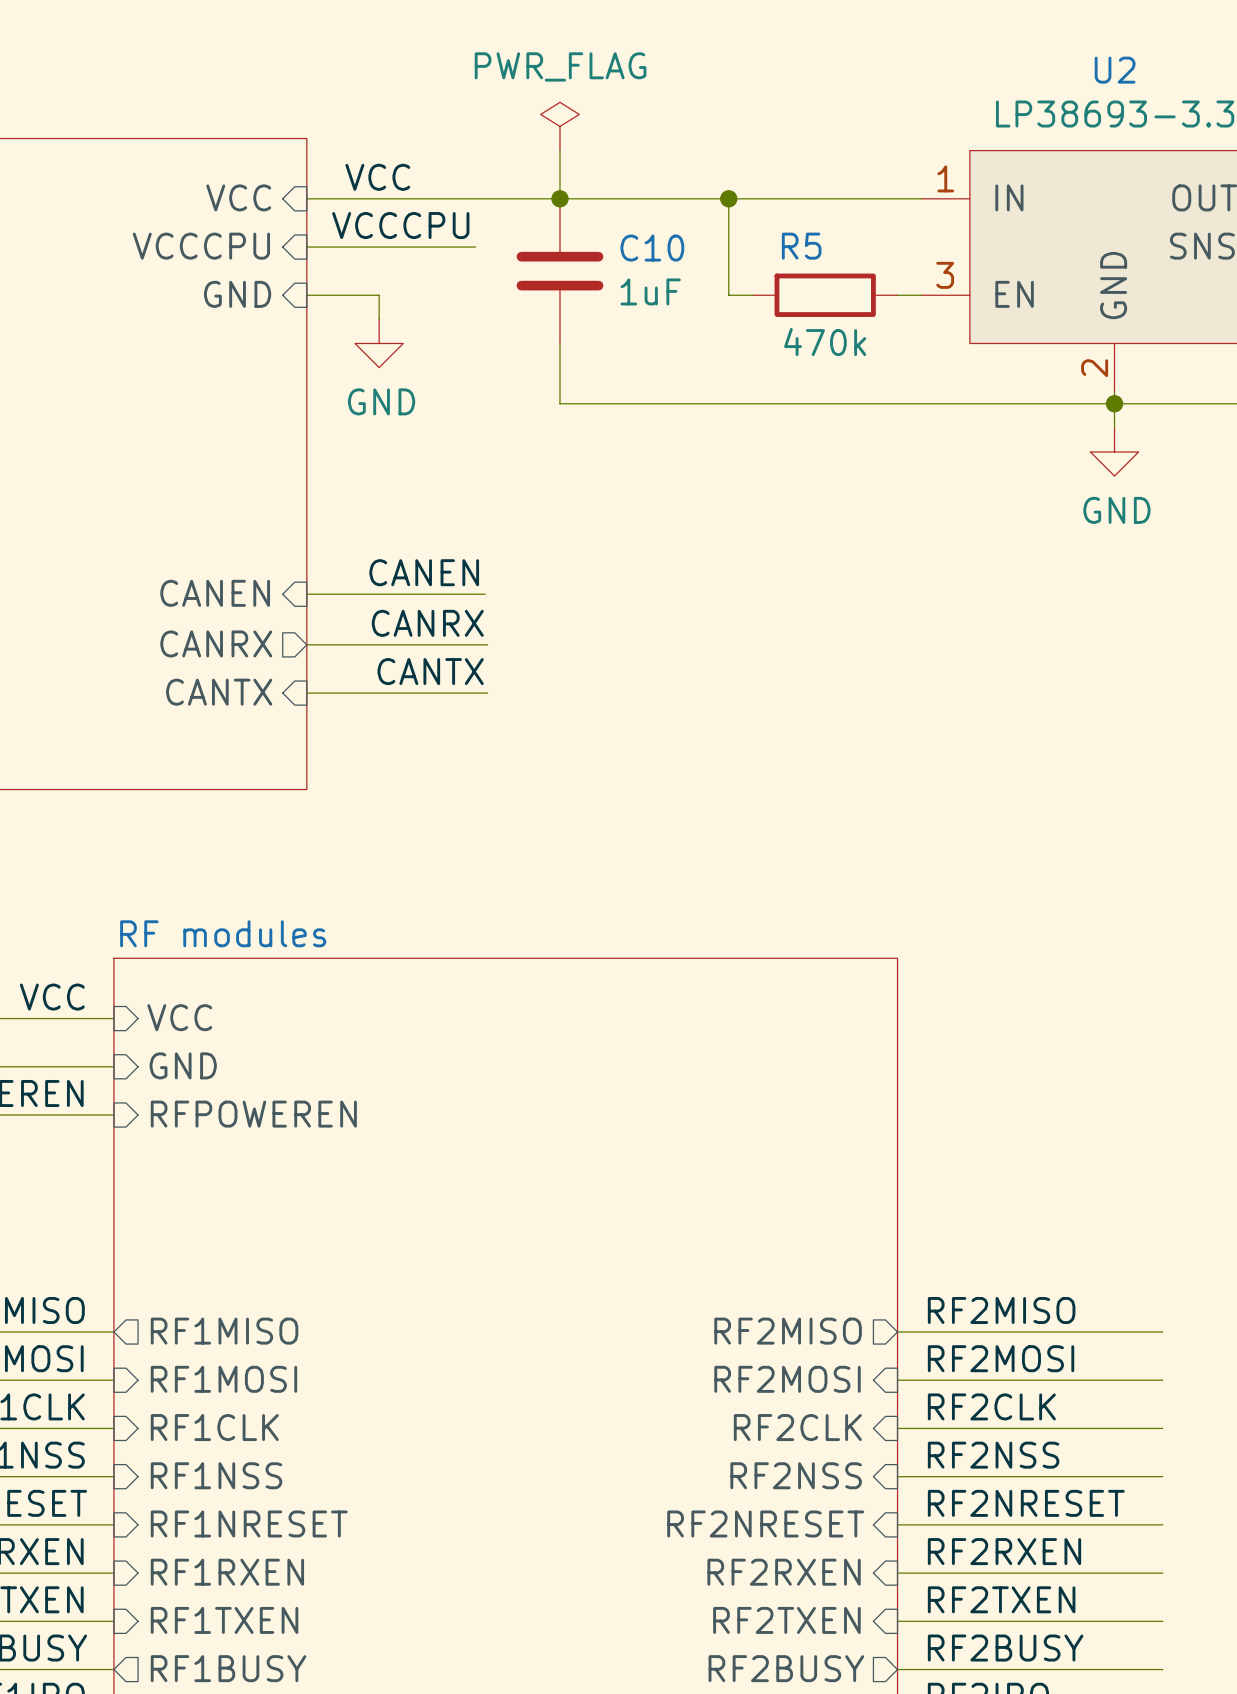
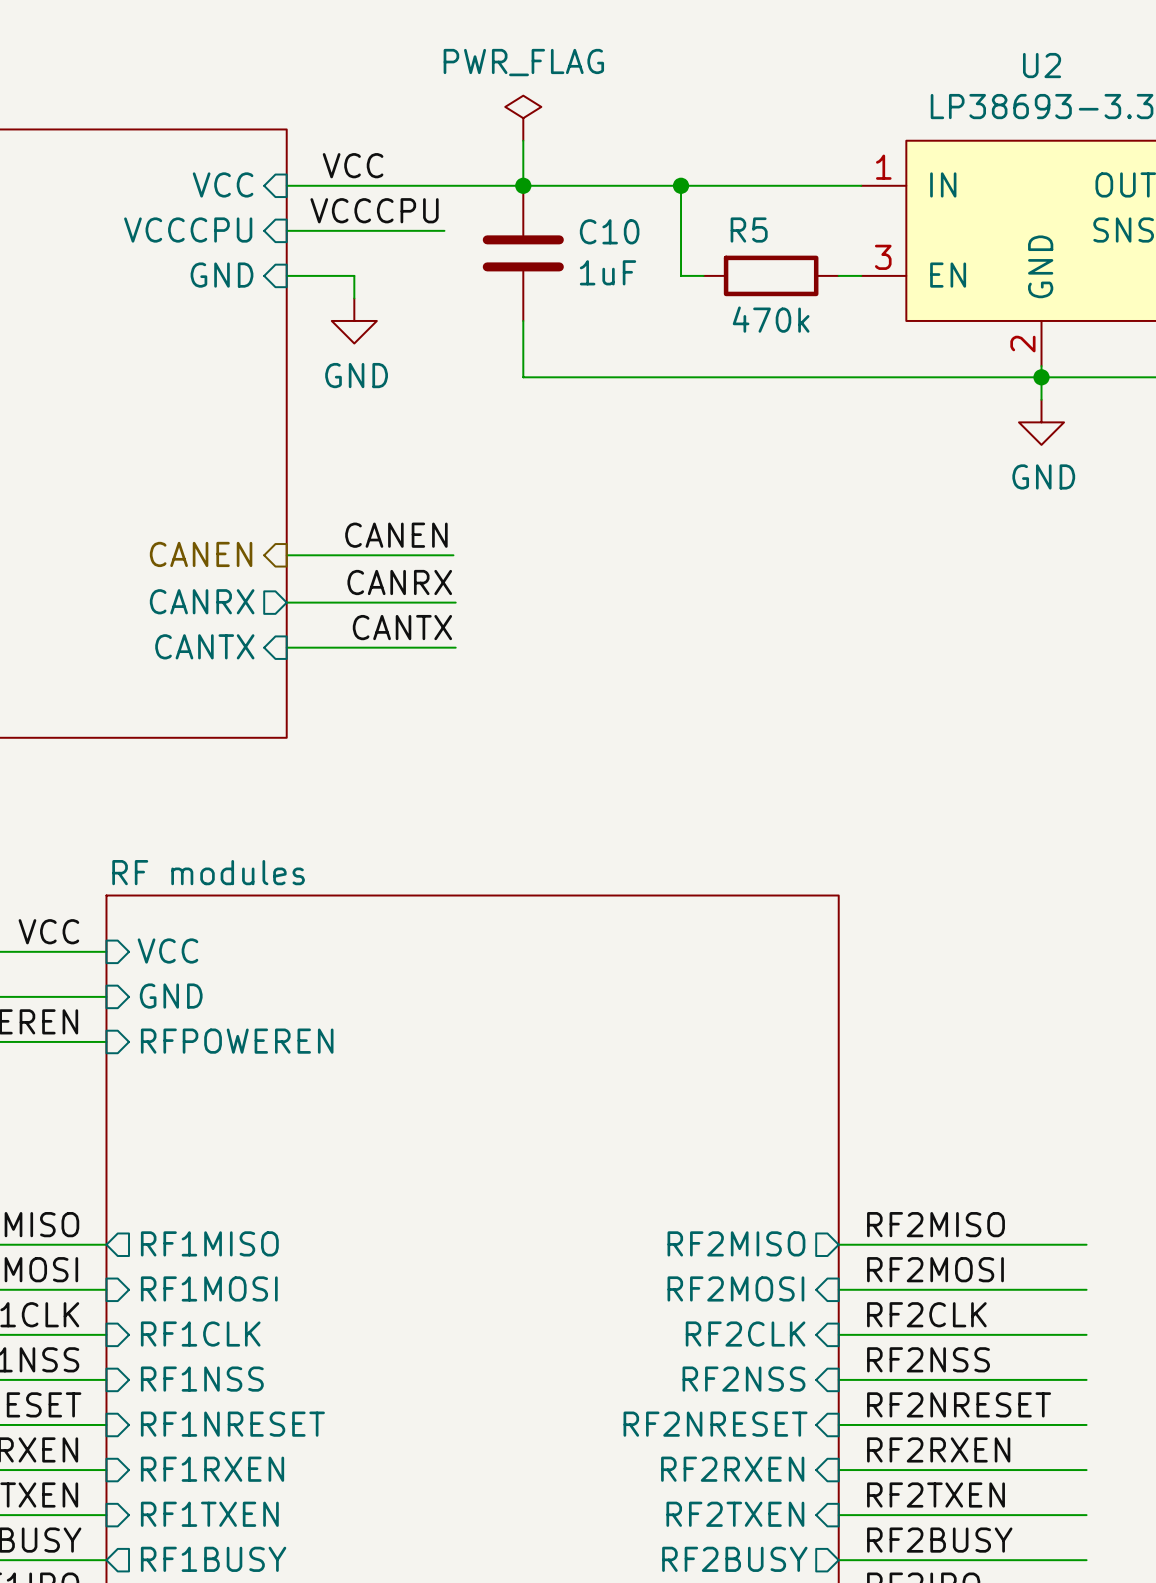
sheet pin: CANEN (215, 593) -> none
hierarchical label: none -> CANEN (201, 554)

